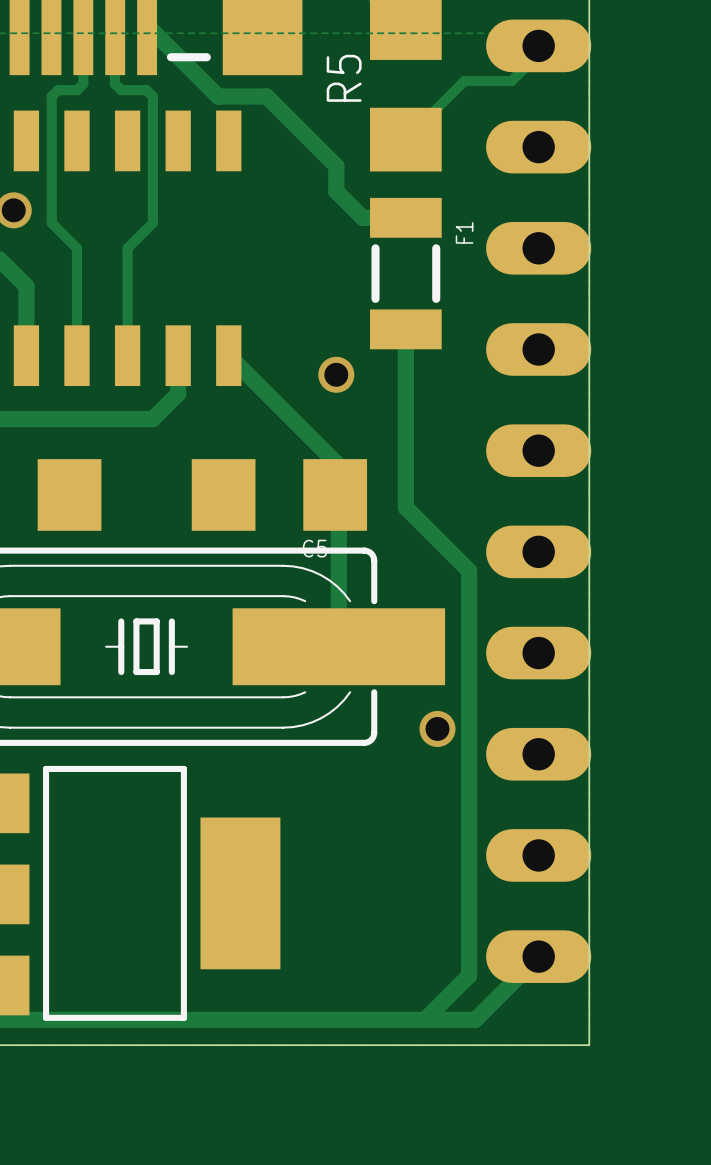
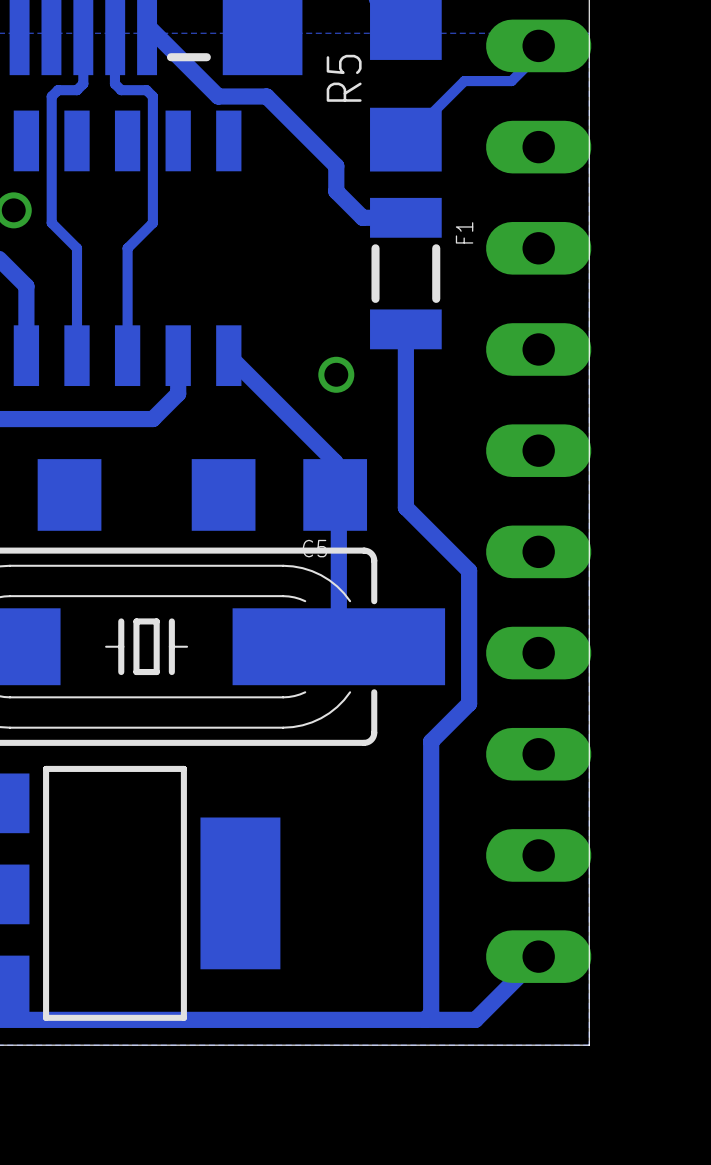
track: (469, 703) (469, 975) (431, 1013) -> (469, 703) (431, 741) (431, 1013)
via: (437, 728) -> none

